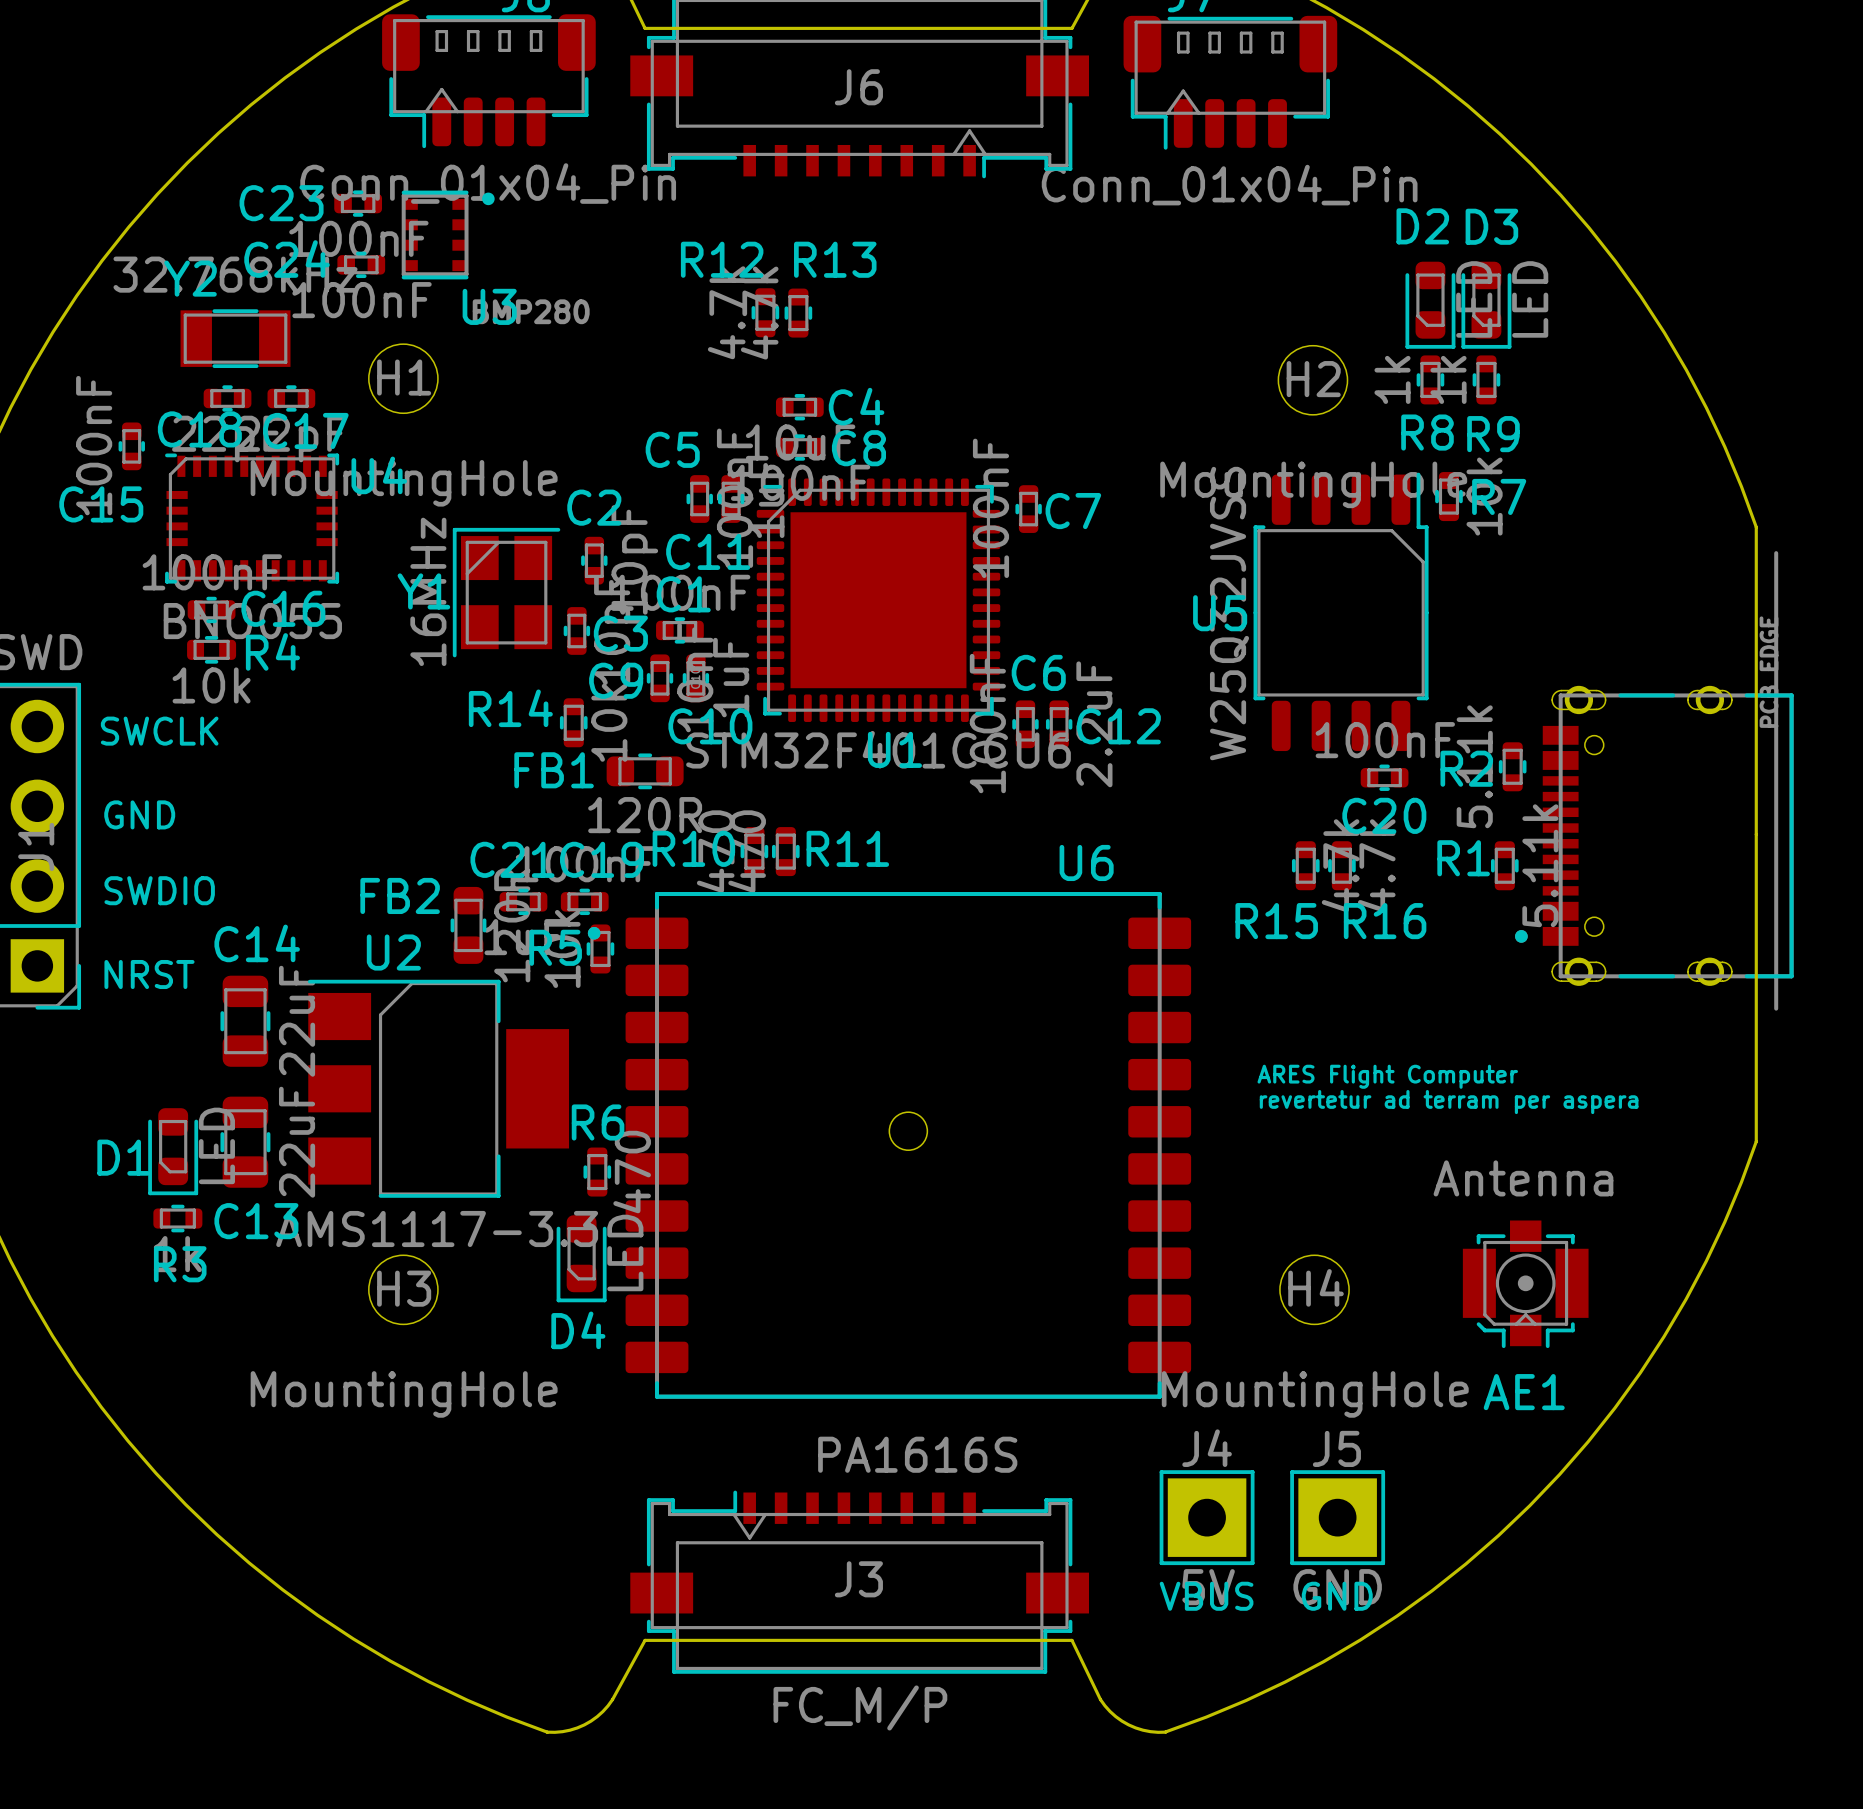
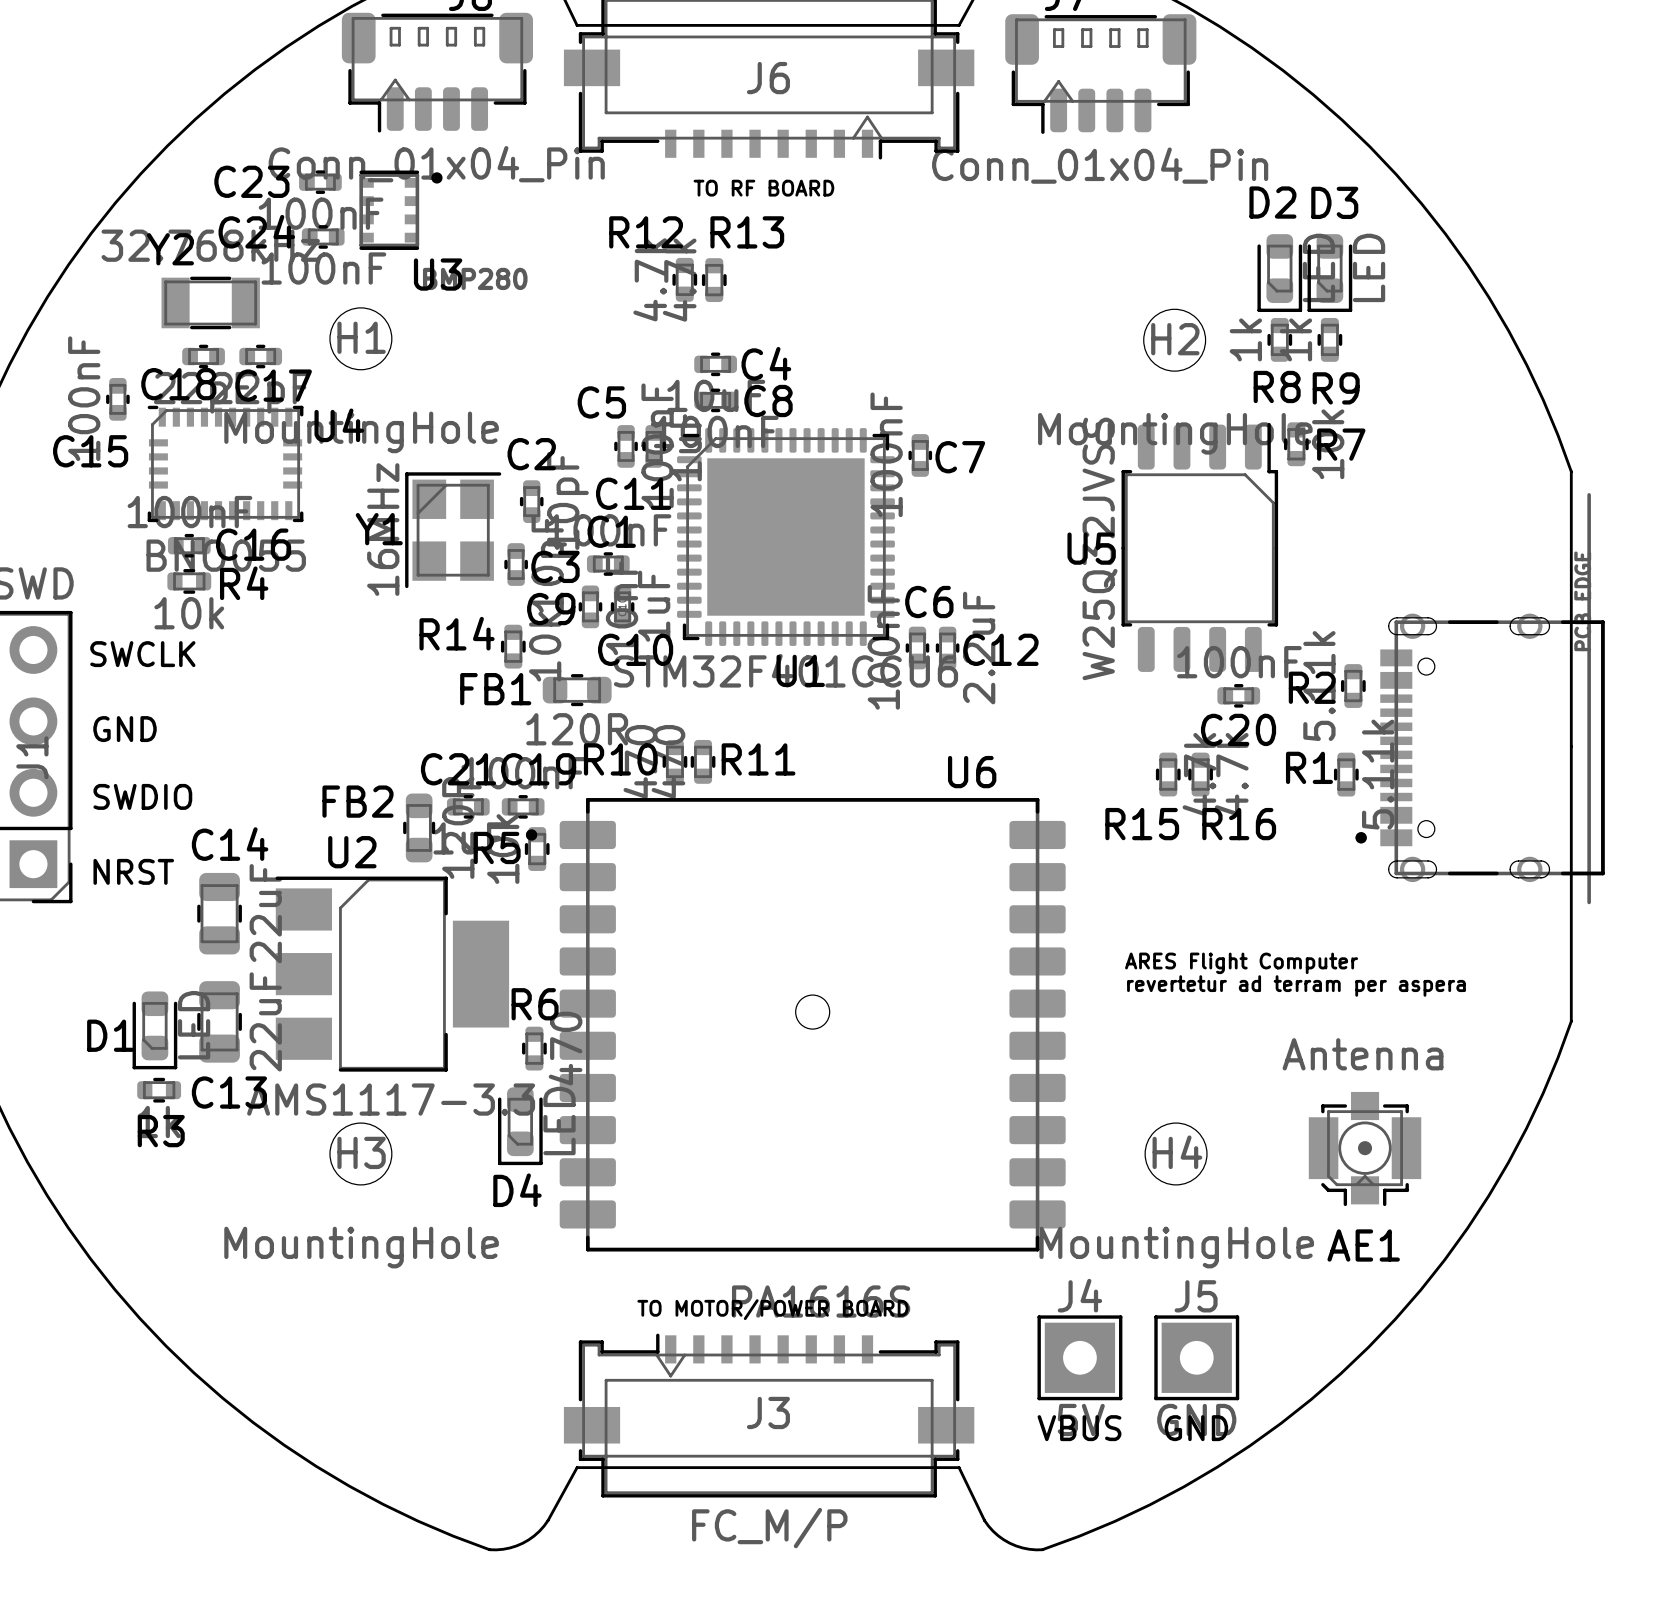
text: none -> TO RF BOARD (763, 188)
text: none -> TO MOTOR/POWER BOARD (772, 1309)

